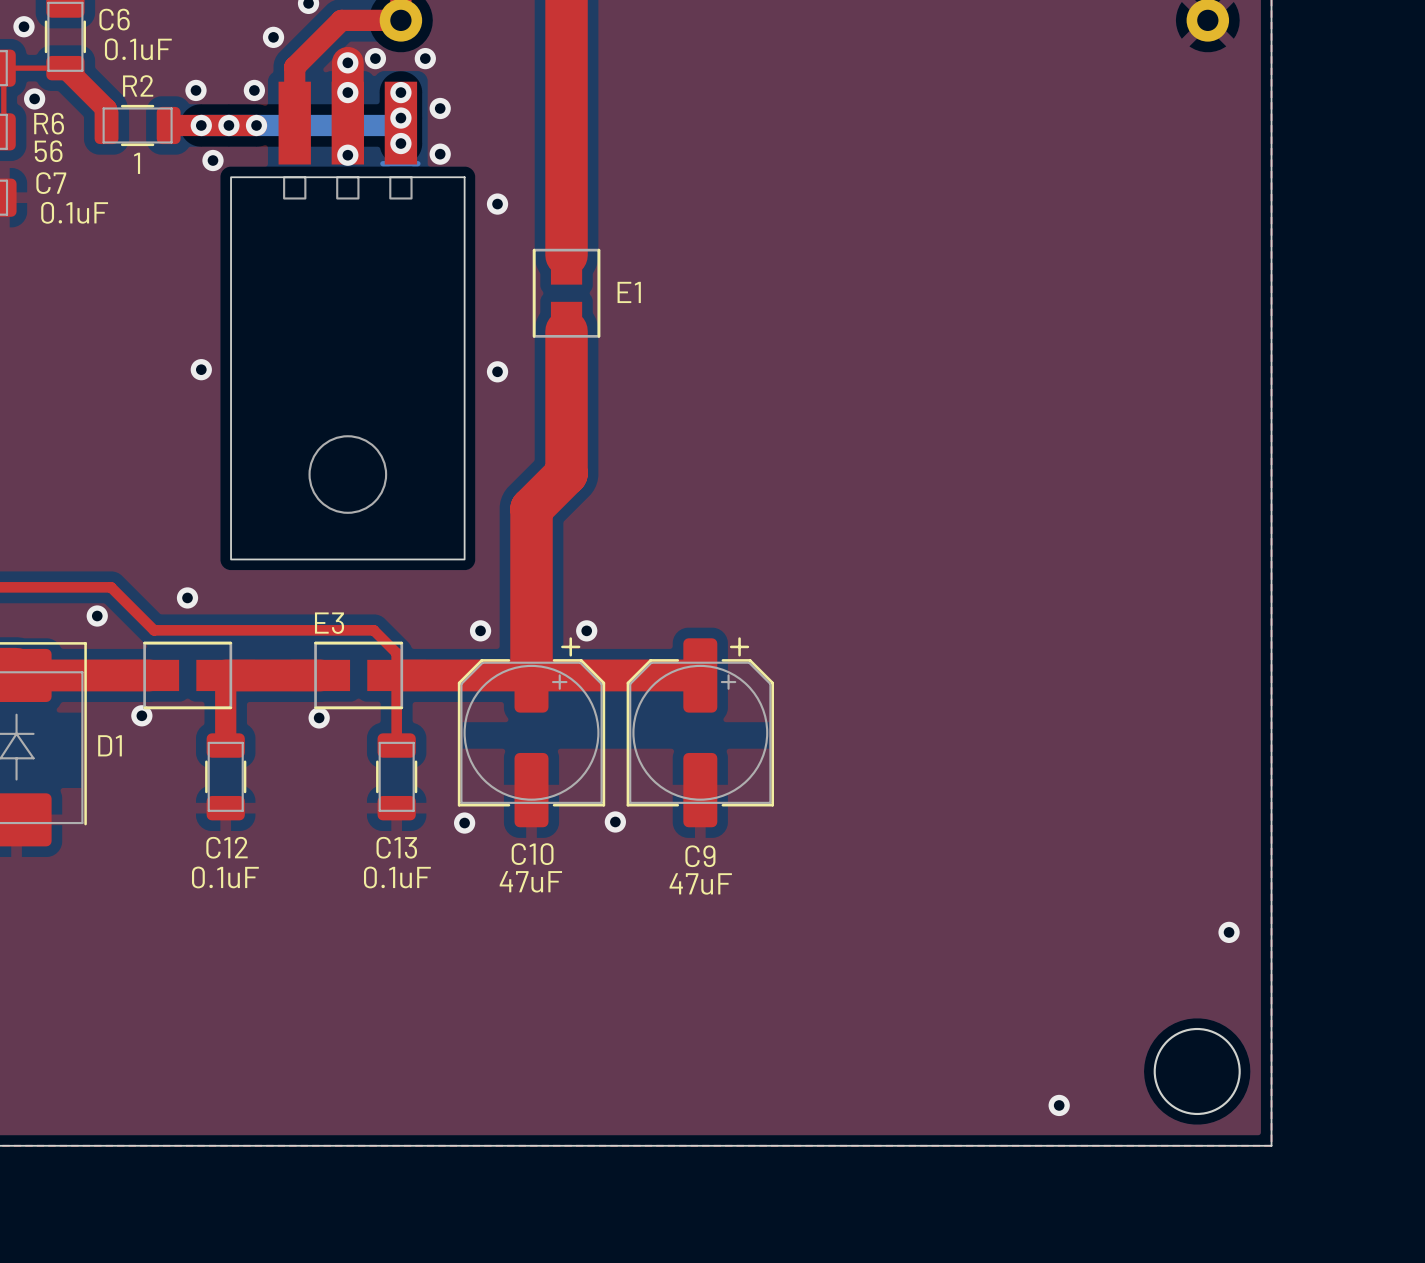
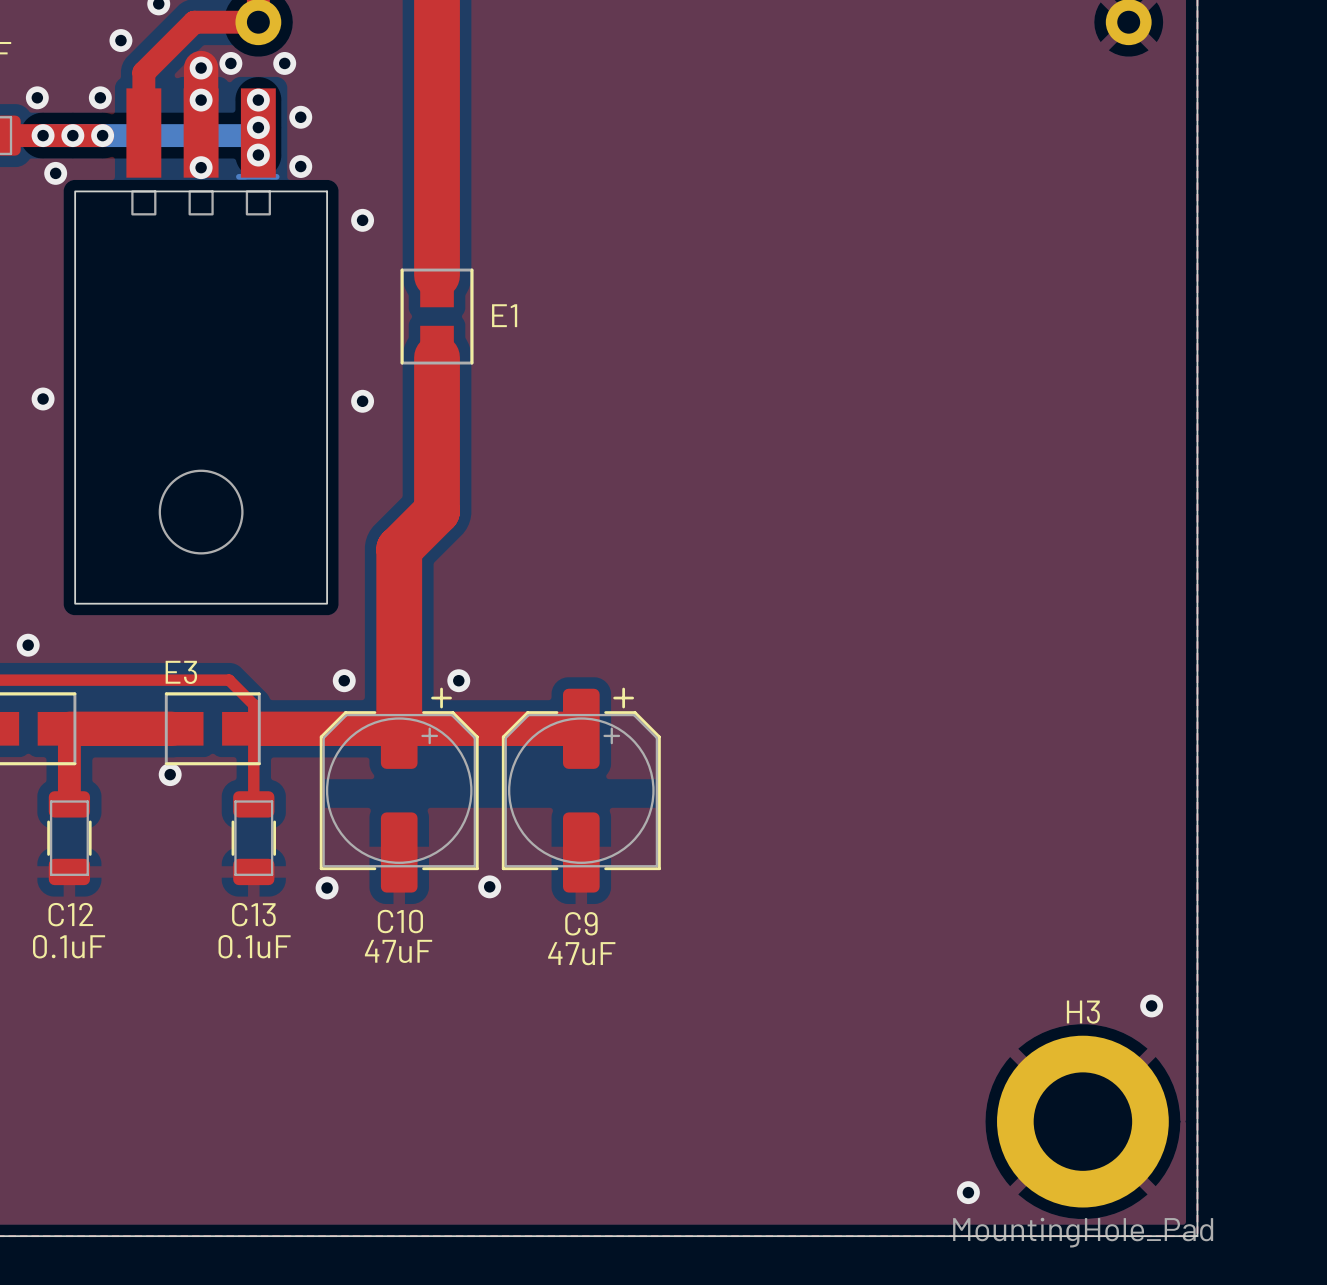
round board edge: [1153, 1027, 1241, 1116] -> none
H3: none -> MountingHole_Pad (1082, 1121)

